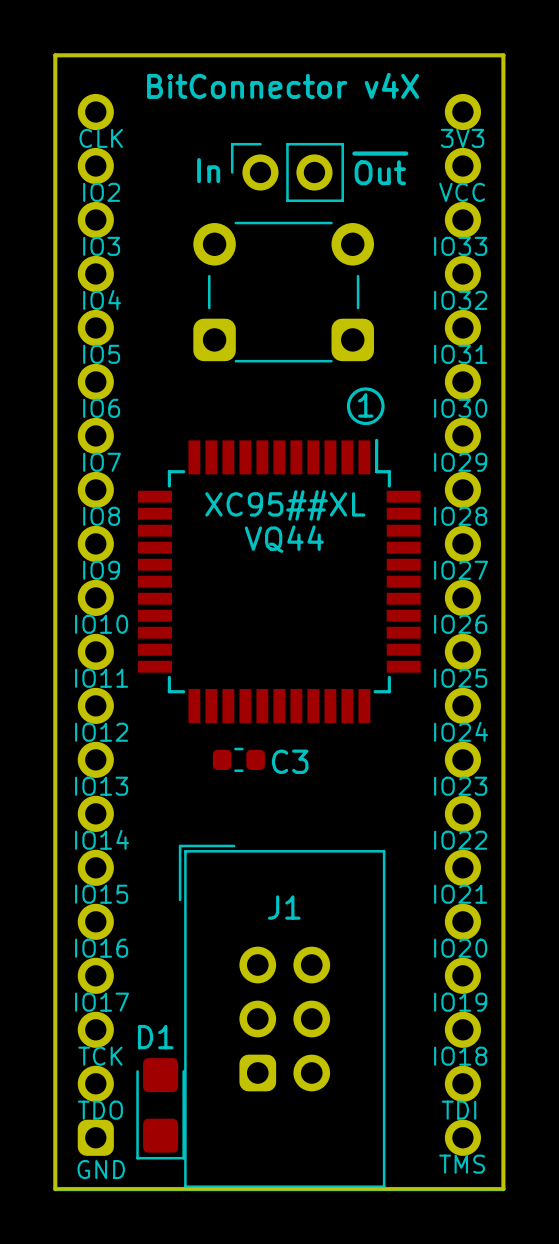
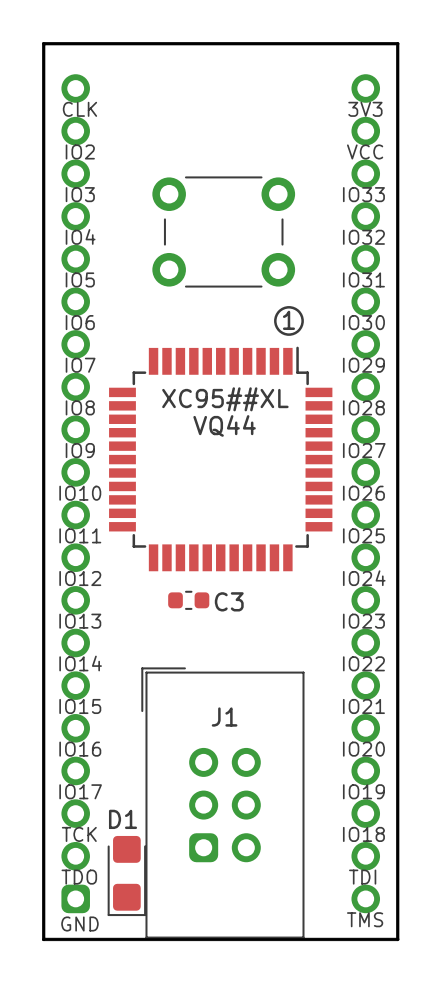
text: BitConnector v4X (283, 85) -> none
text: _ (380, 153) -> none
text: In (208, 170) -> none
part: (287, 172) -> none
text: Out (380, 172) -> none
part footprint: [193, 221, 375, 363] -> [152, 176, 296, 288]

